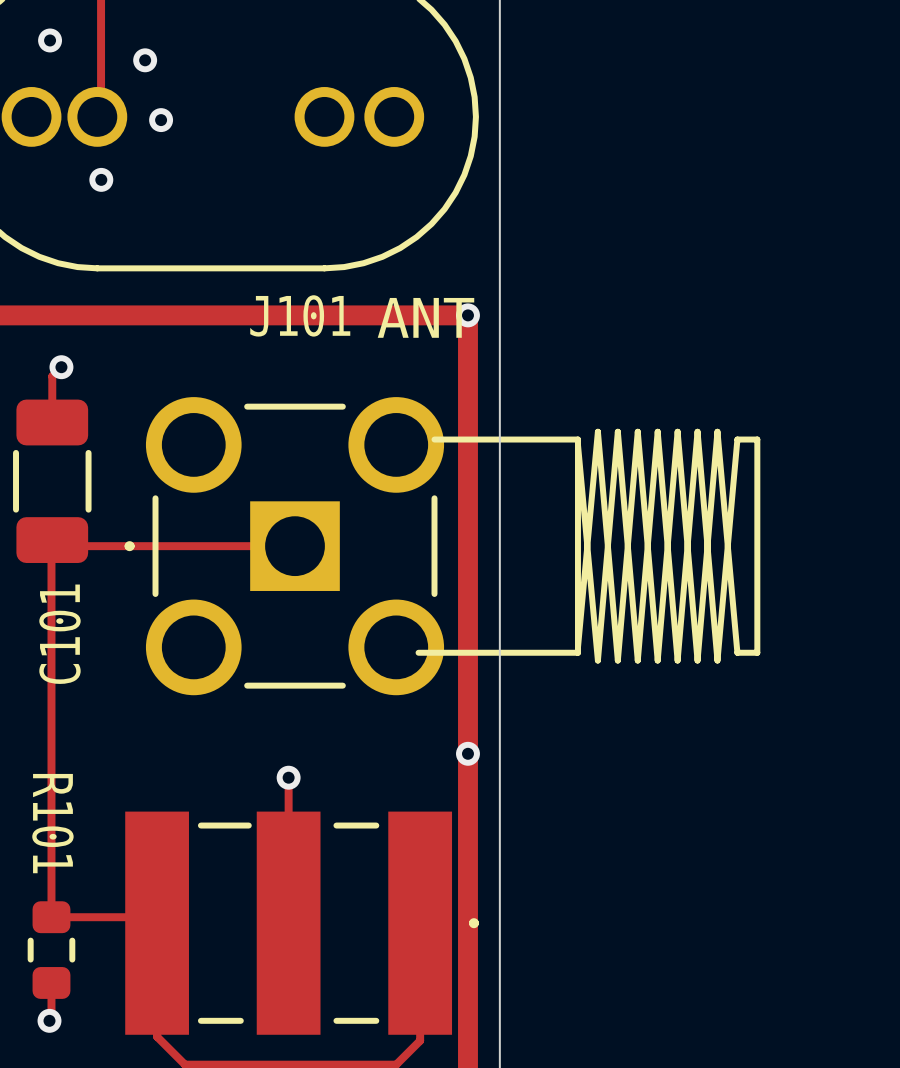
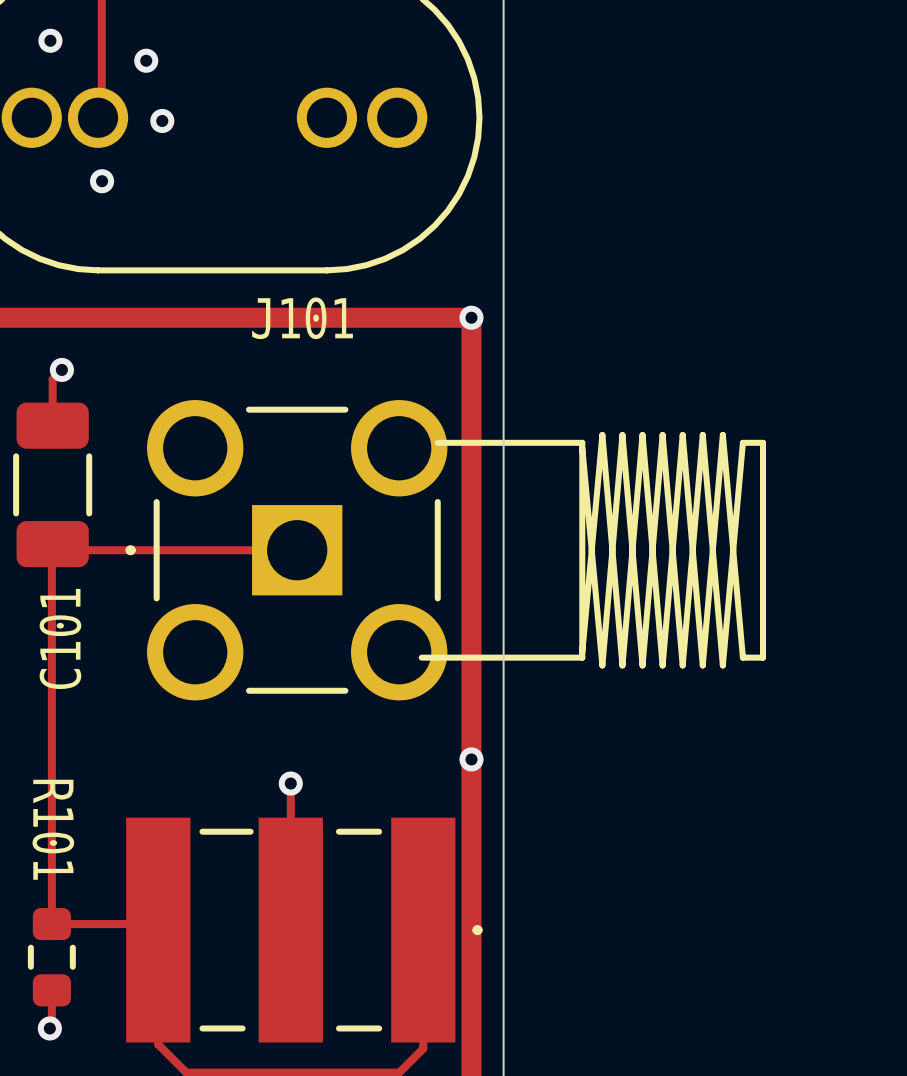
J101 text: ANT (425, 317) -> none

